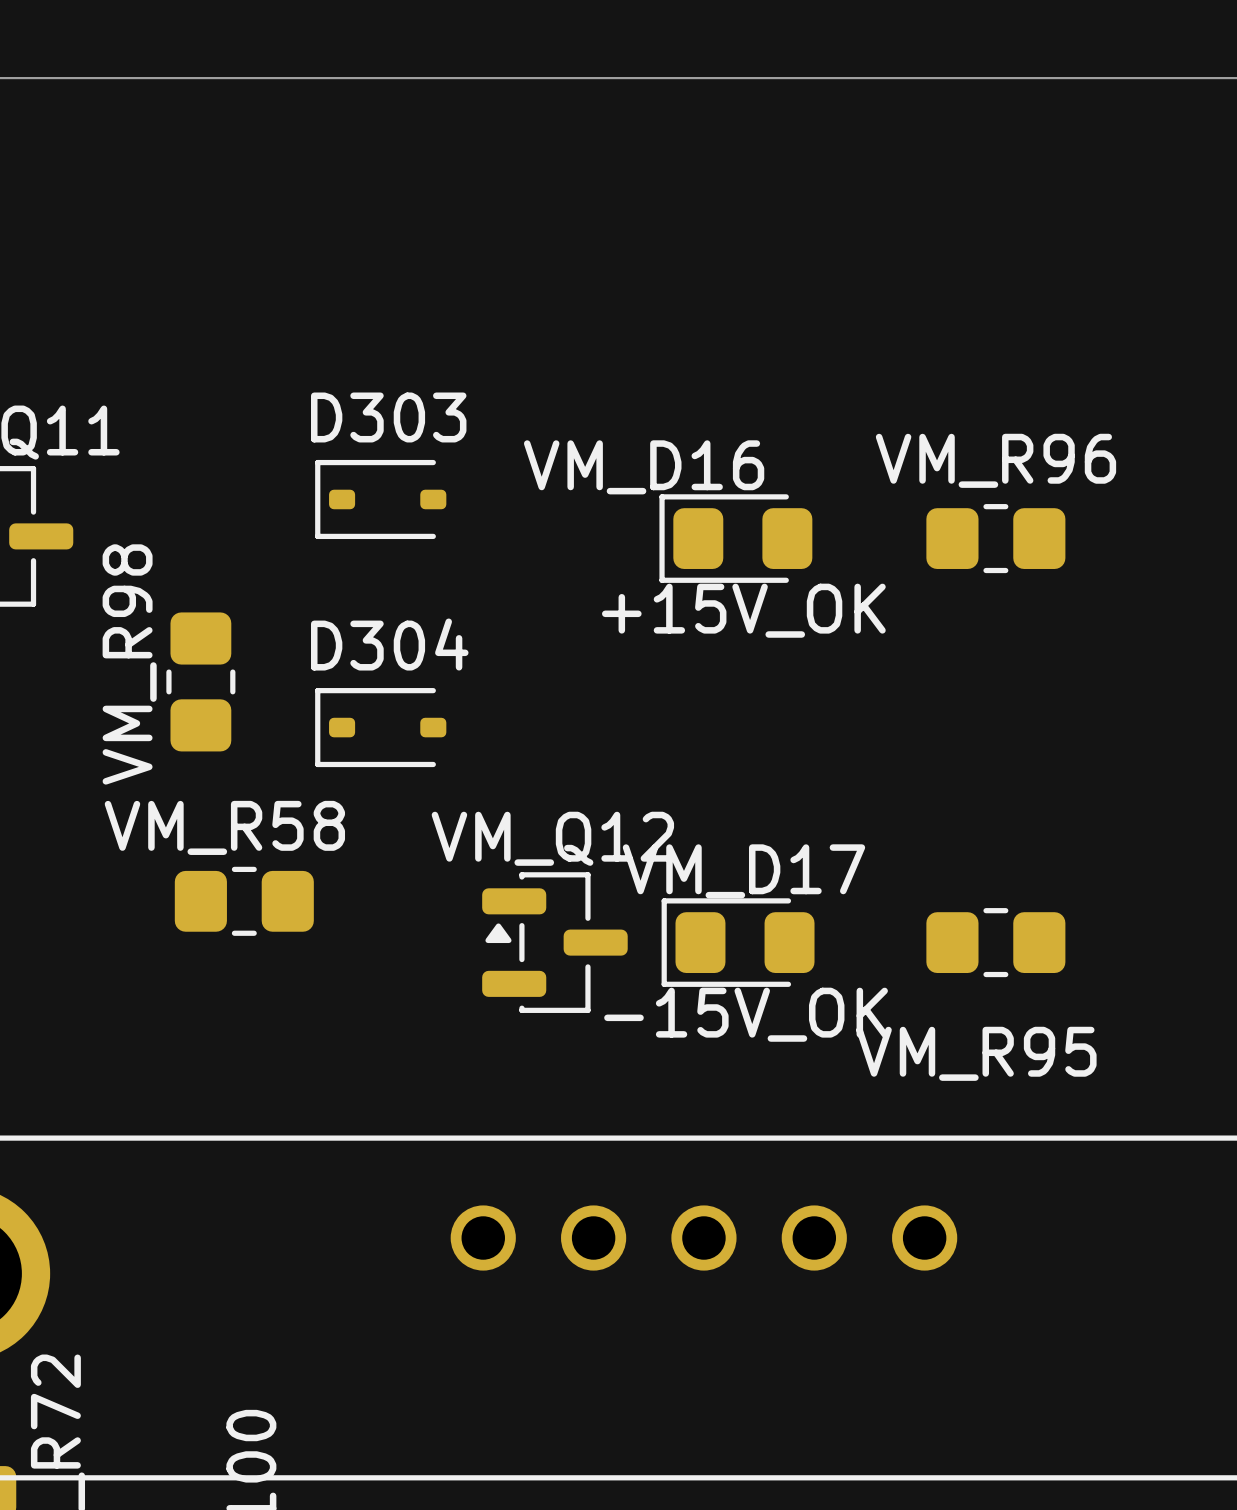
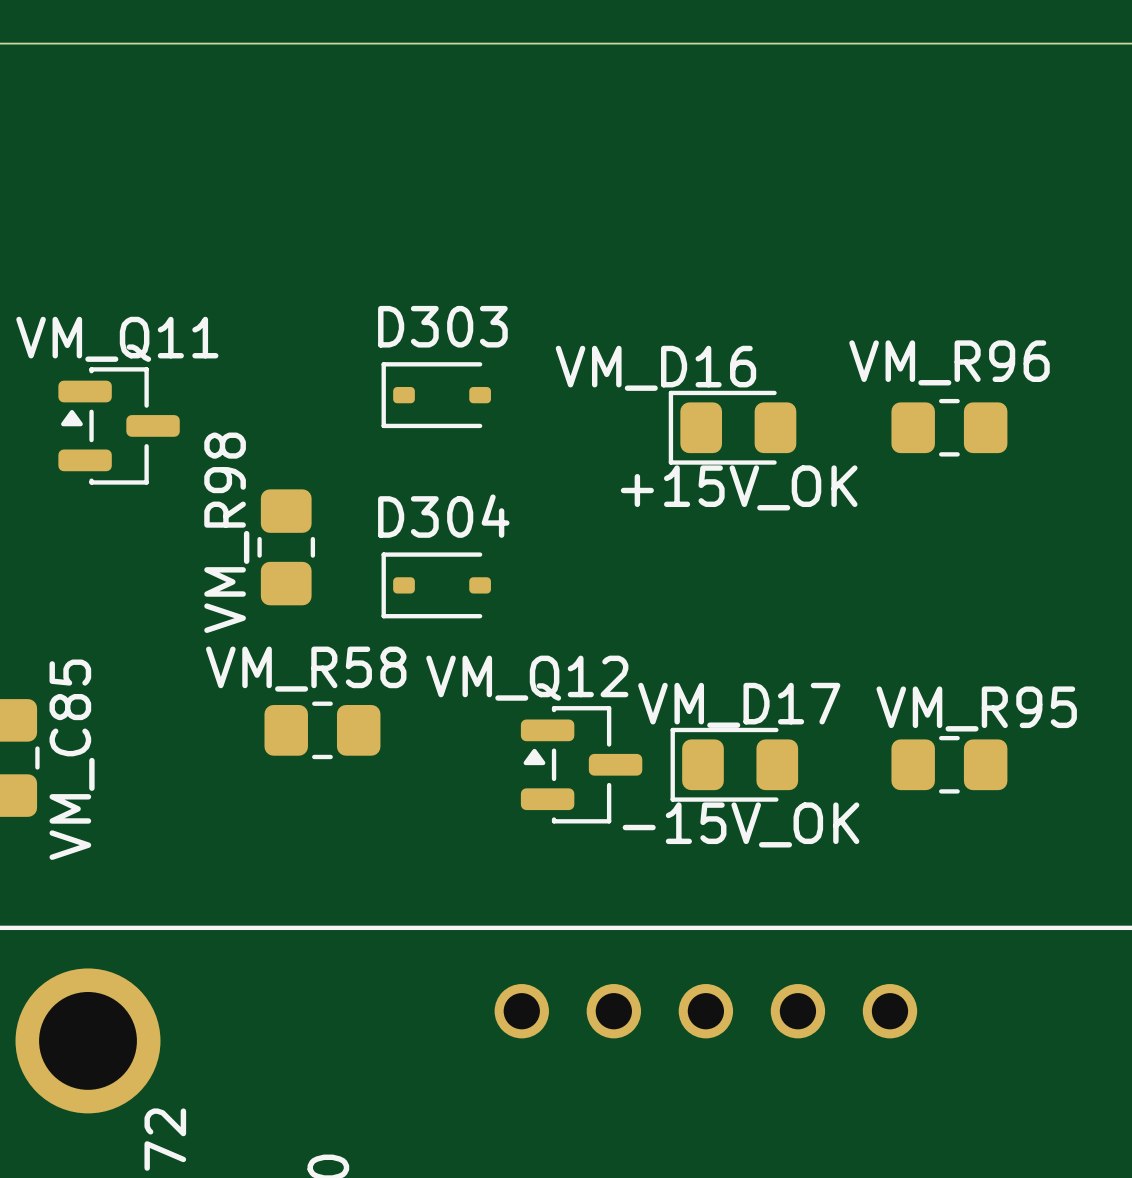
VM_Q12 name position: VM_Q12 (552, 838) -> VM_Q12 (527, 678)
VM_R95 name position: VM_R95 (976, 1053) -> VM_R95 (976, 708)

